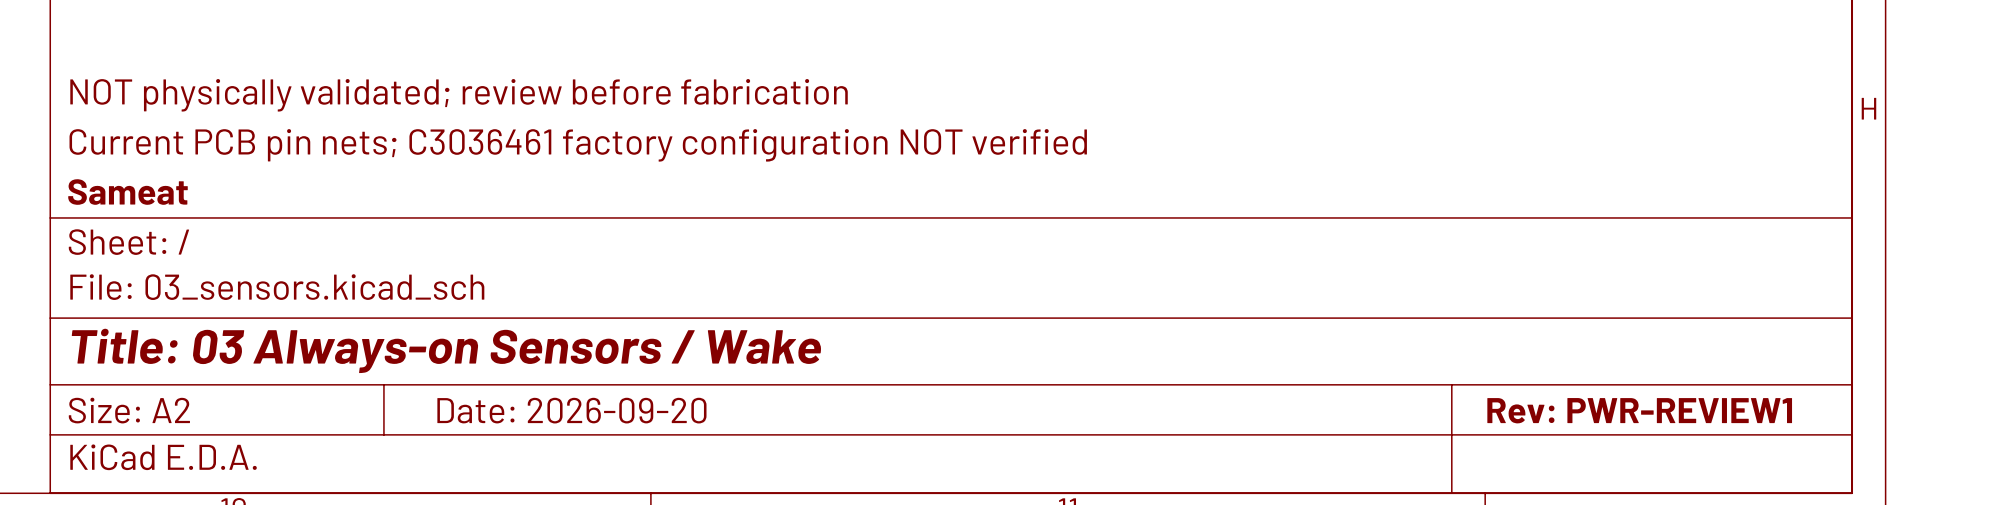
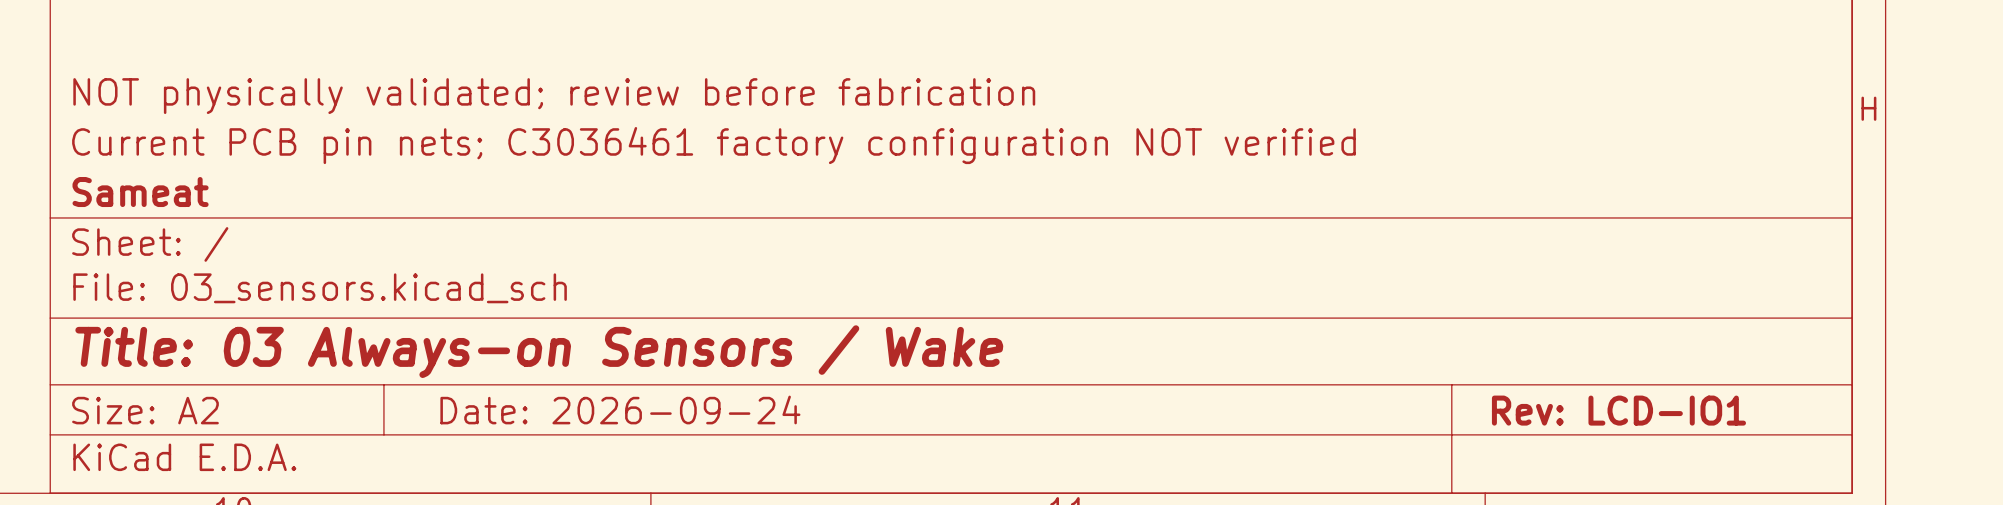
title block: Date: 2026-09-20 (571, 410) -> Date: 2026-09-24 (620, 409)
title block: Rev: PWR-REVIEW1 (1639, 410) -> Rev: LCD-IO1 (1618, 410)

